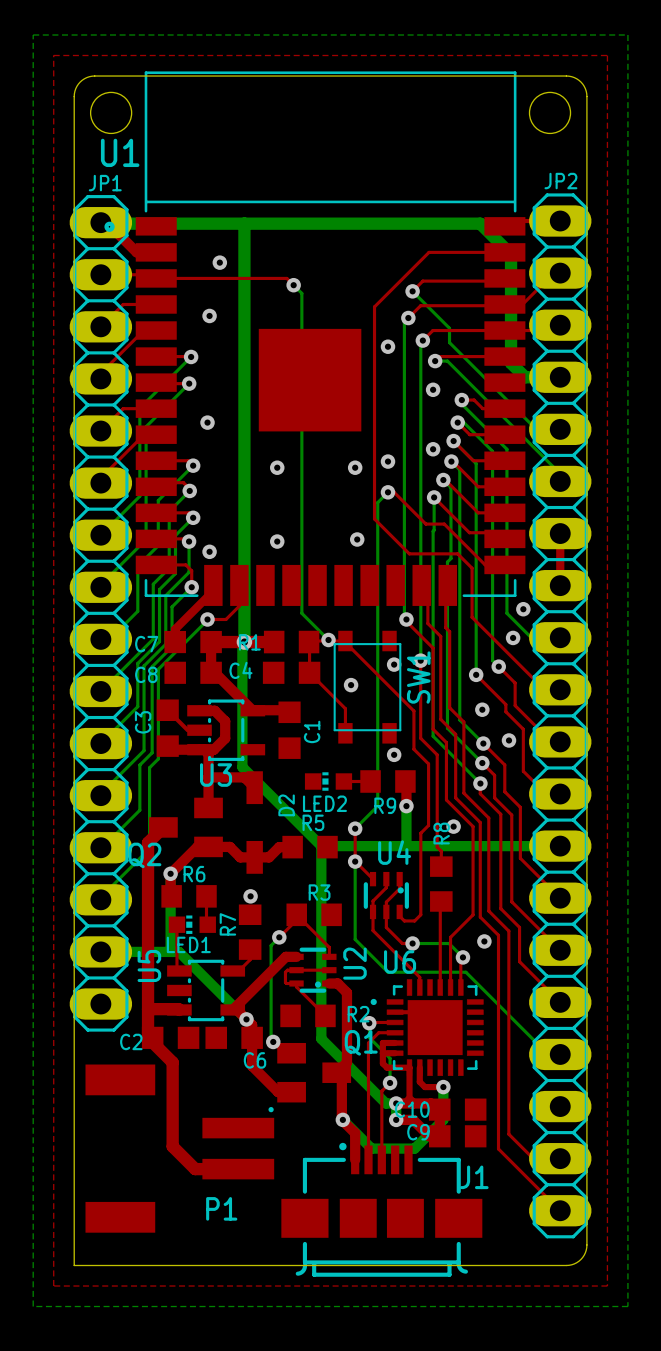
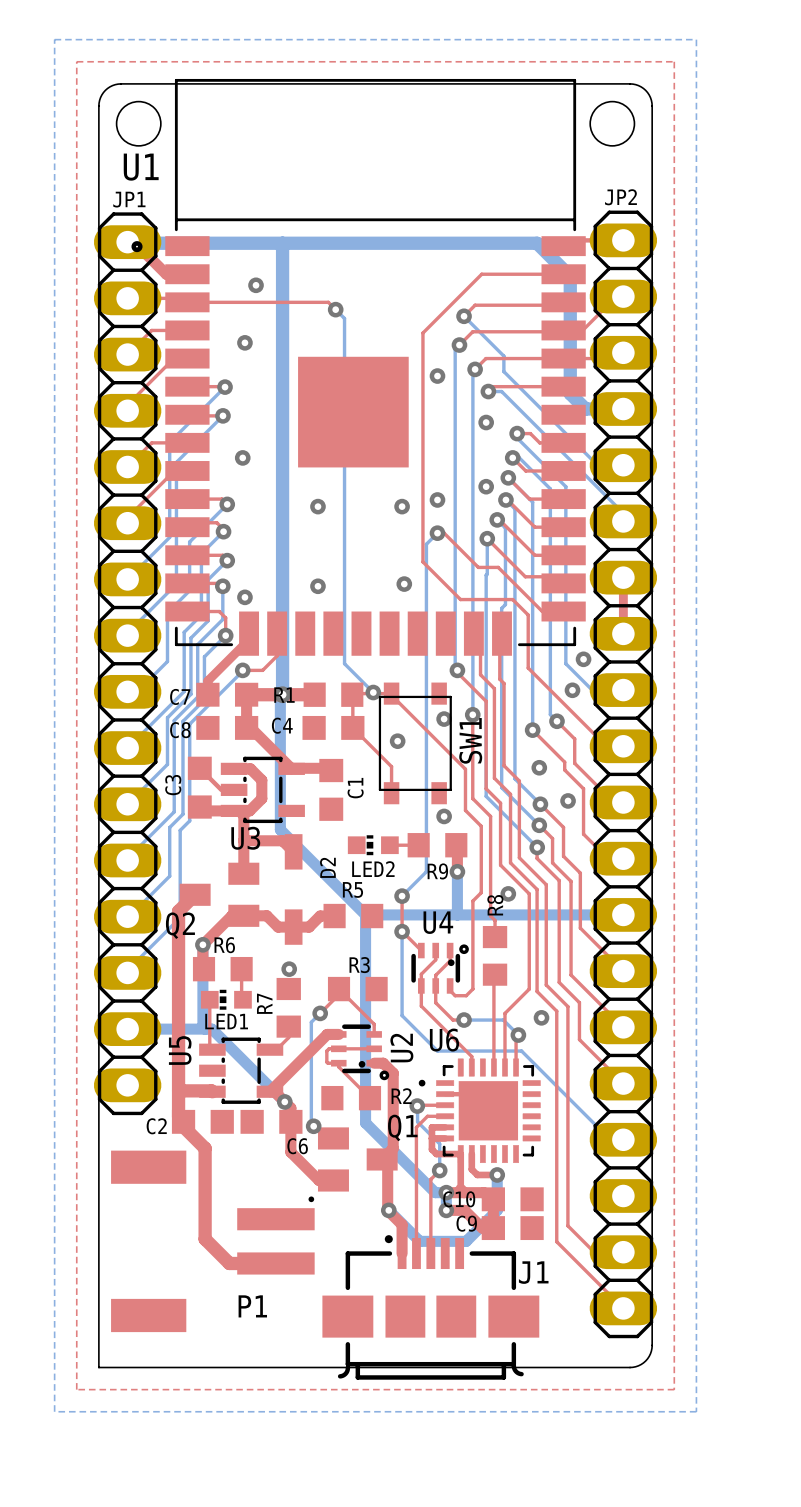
drawing: none -> [459, 944, 469, 955]
drawing: none -> [379, 1070, 390, 1081]

